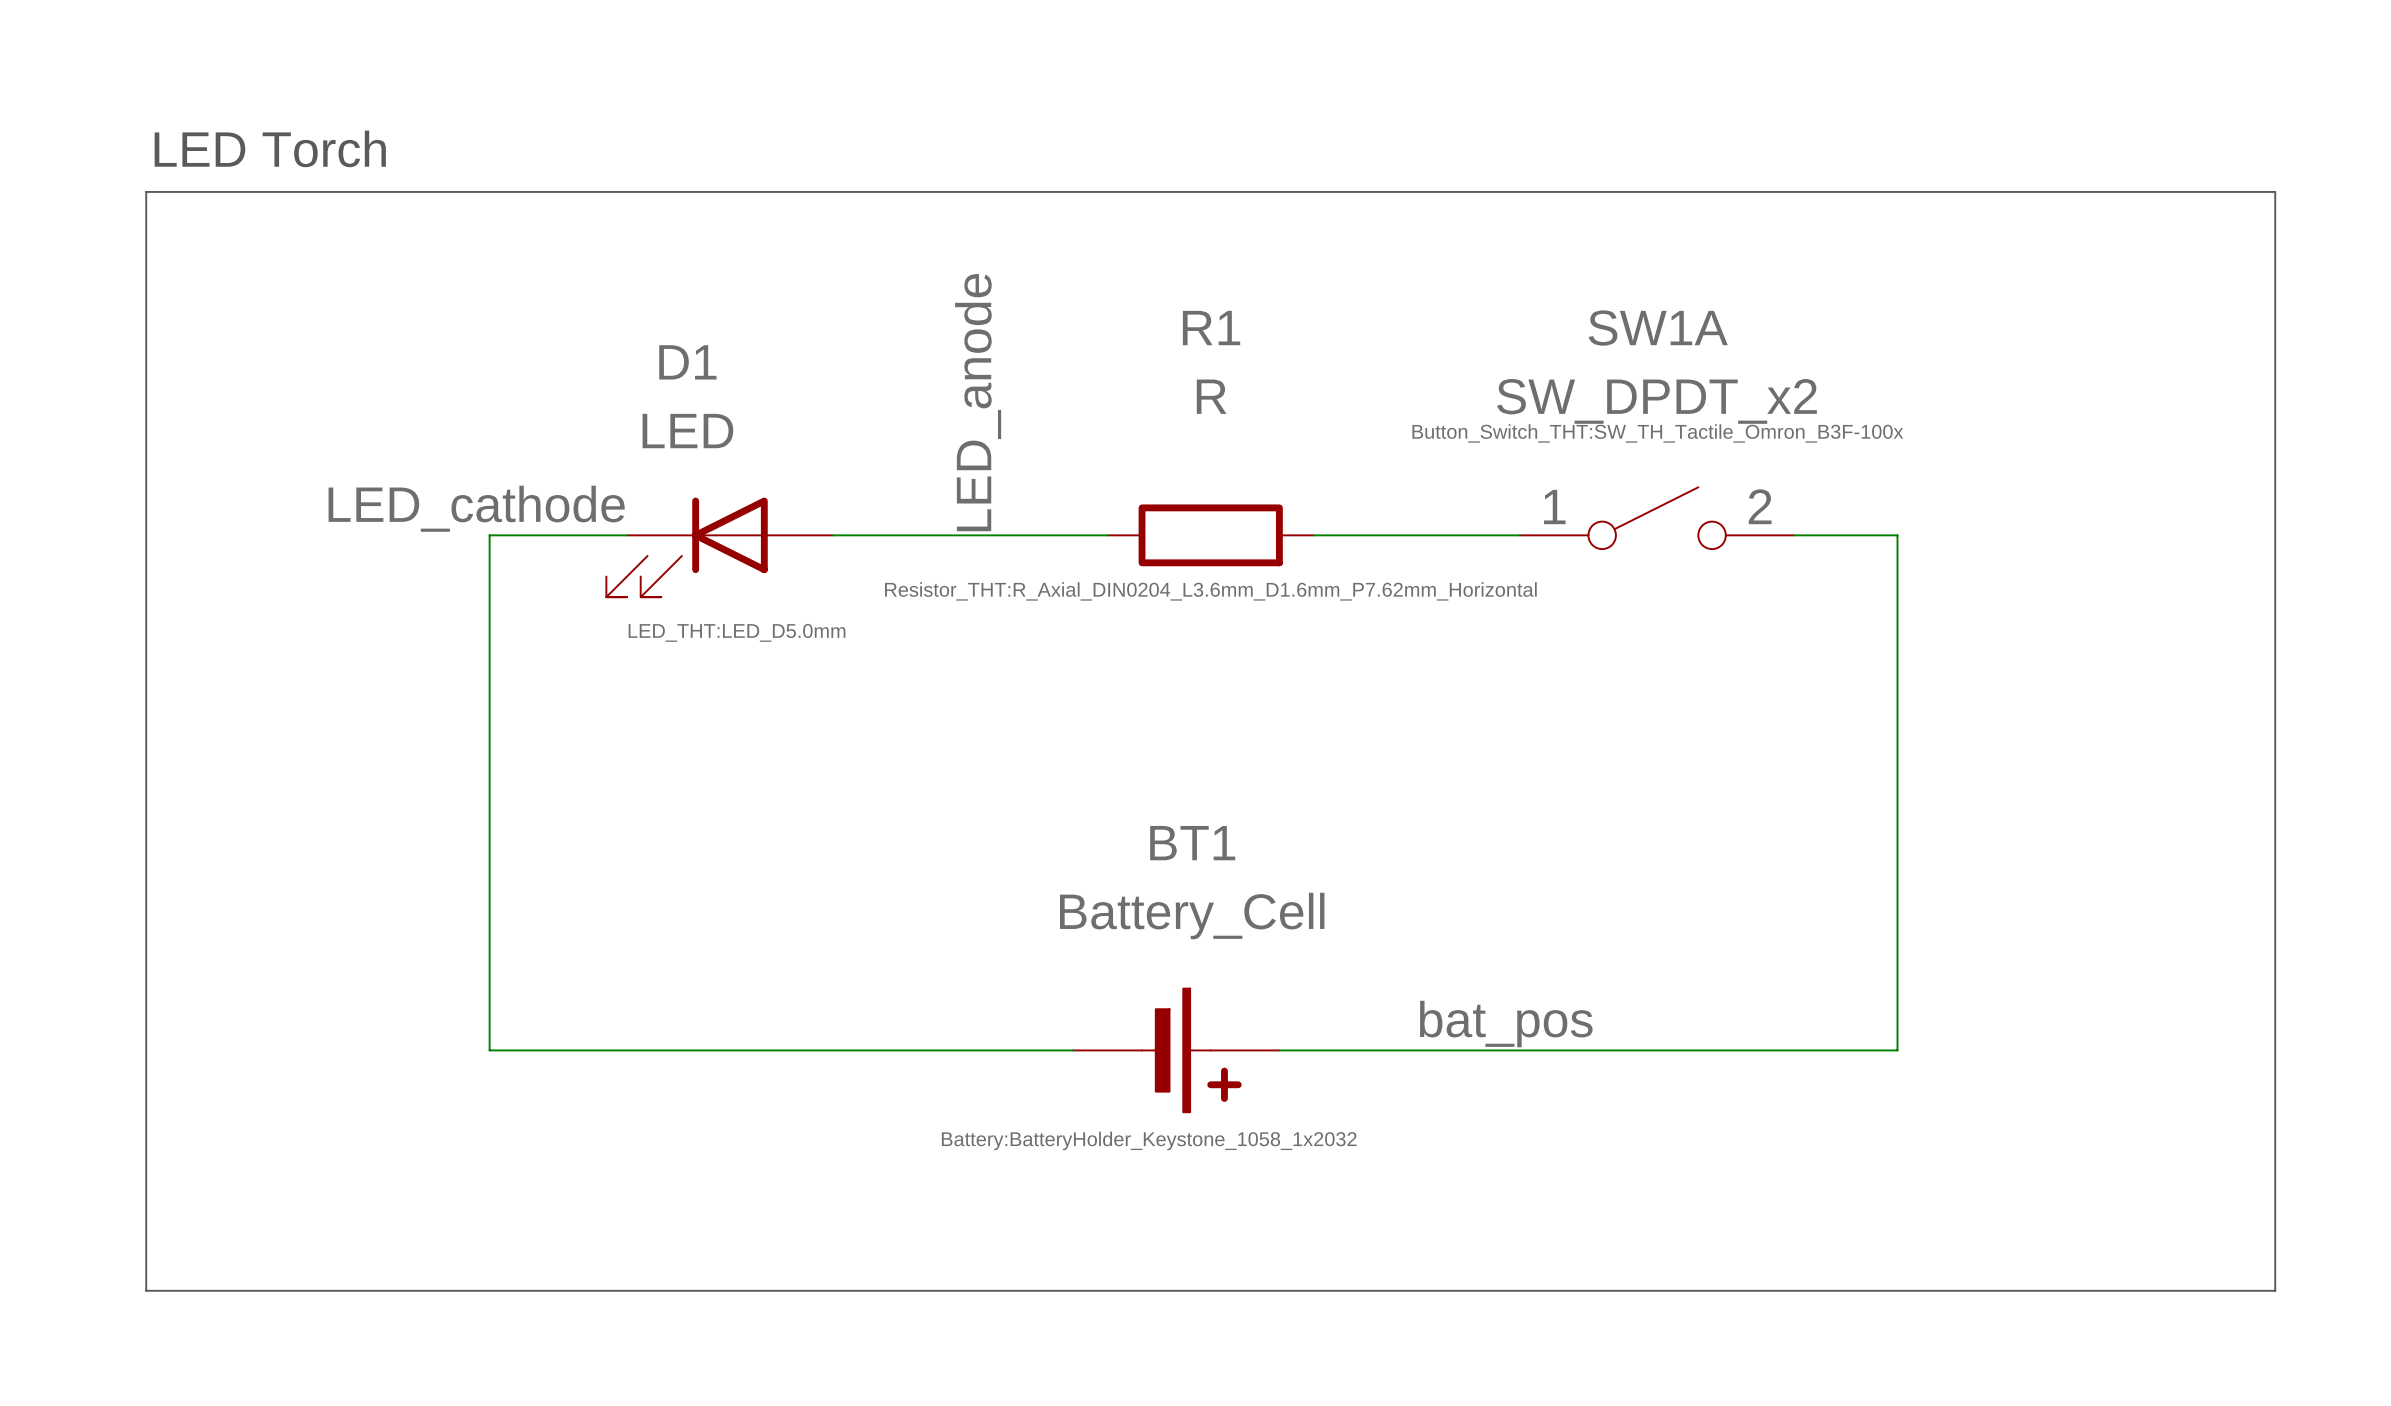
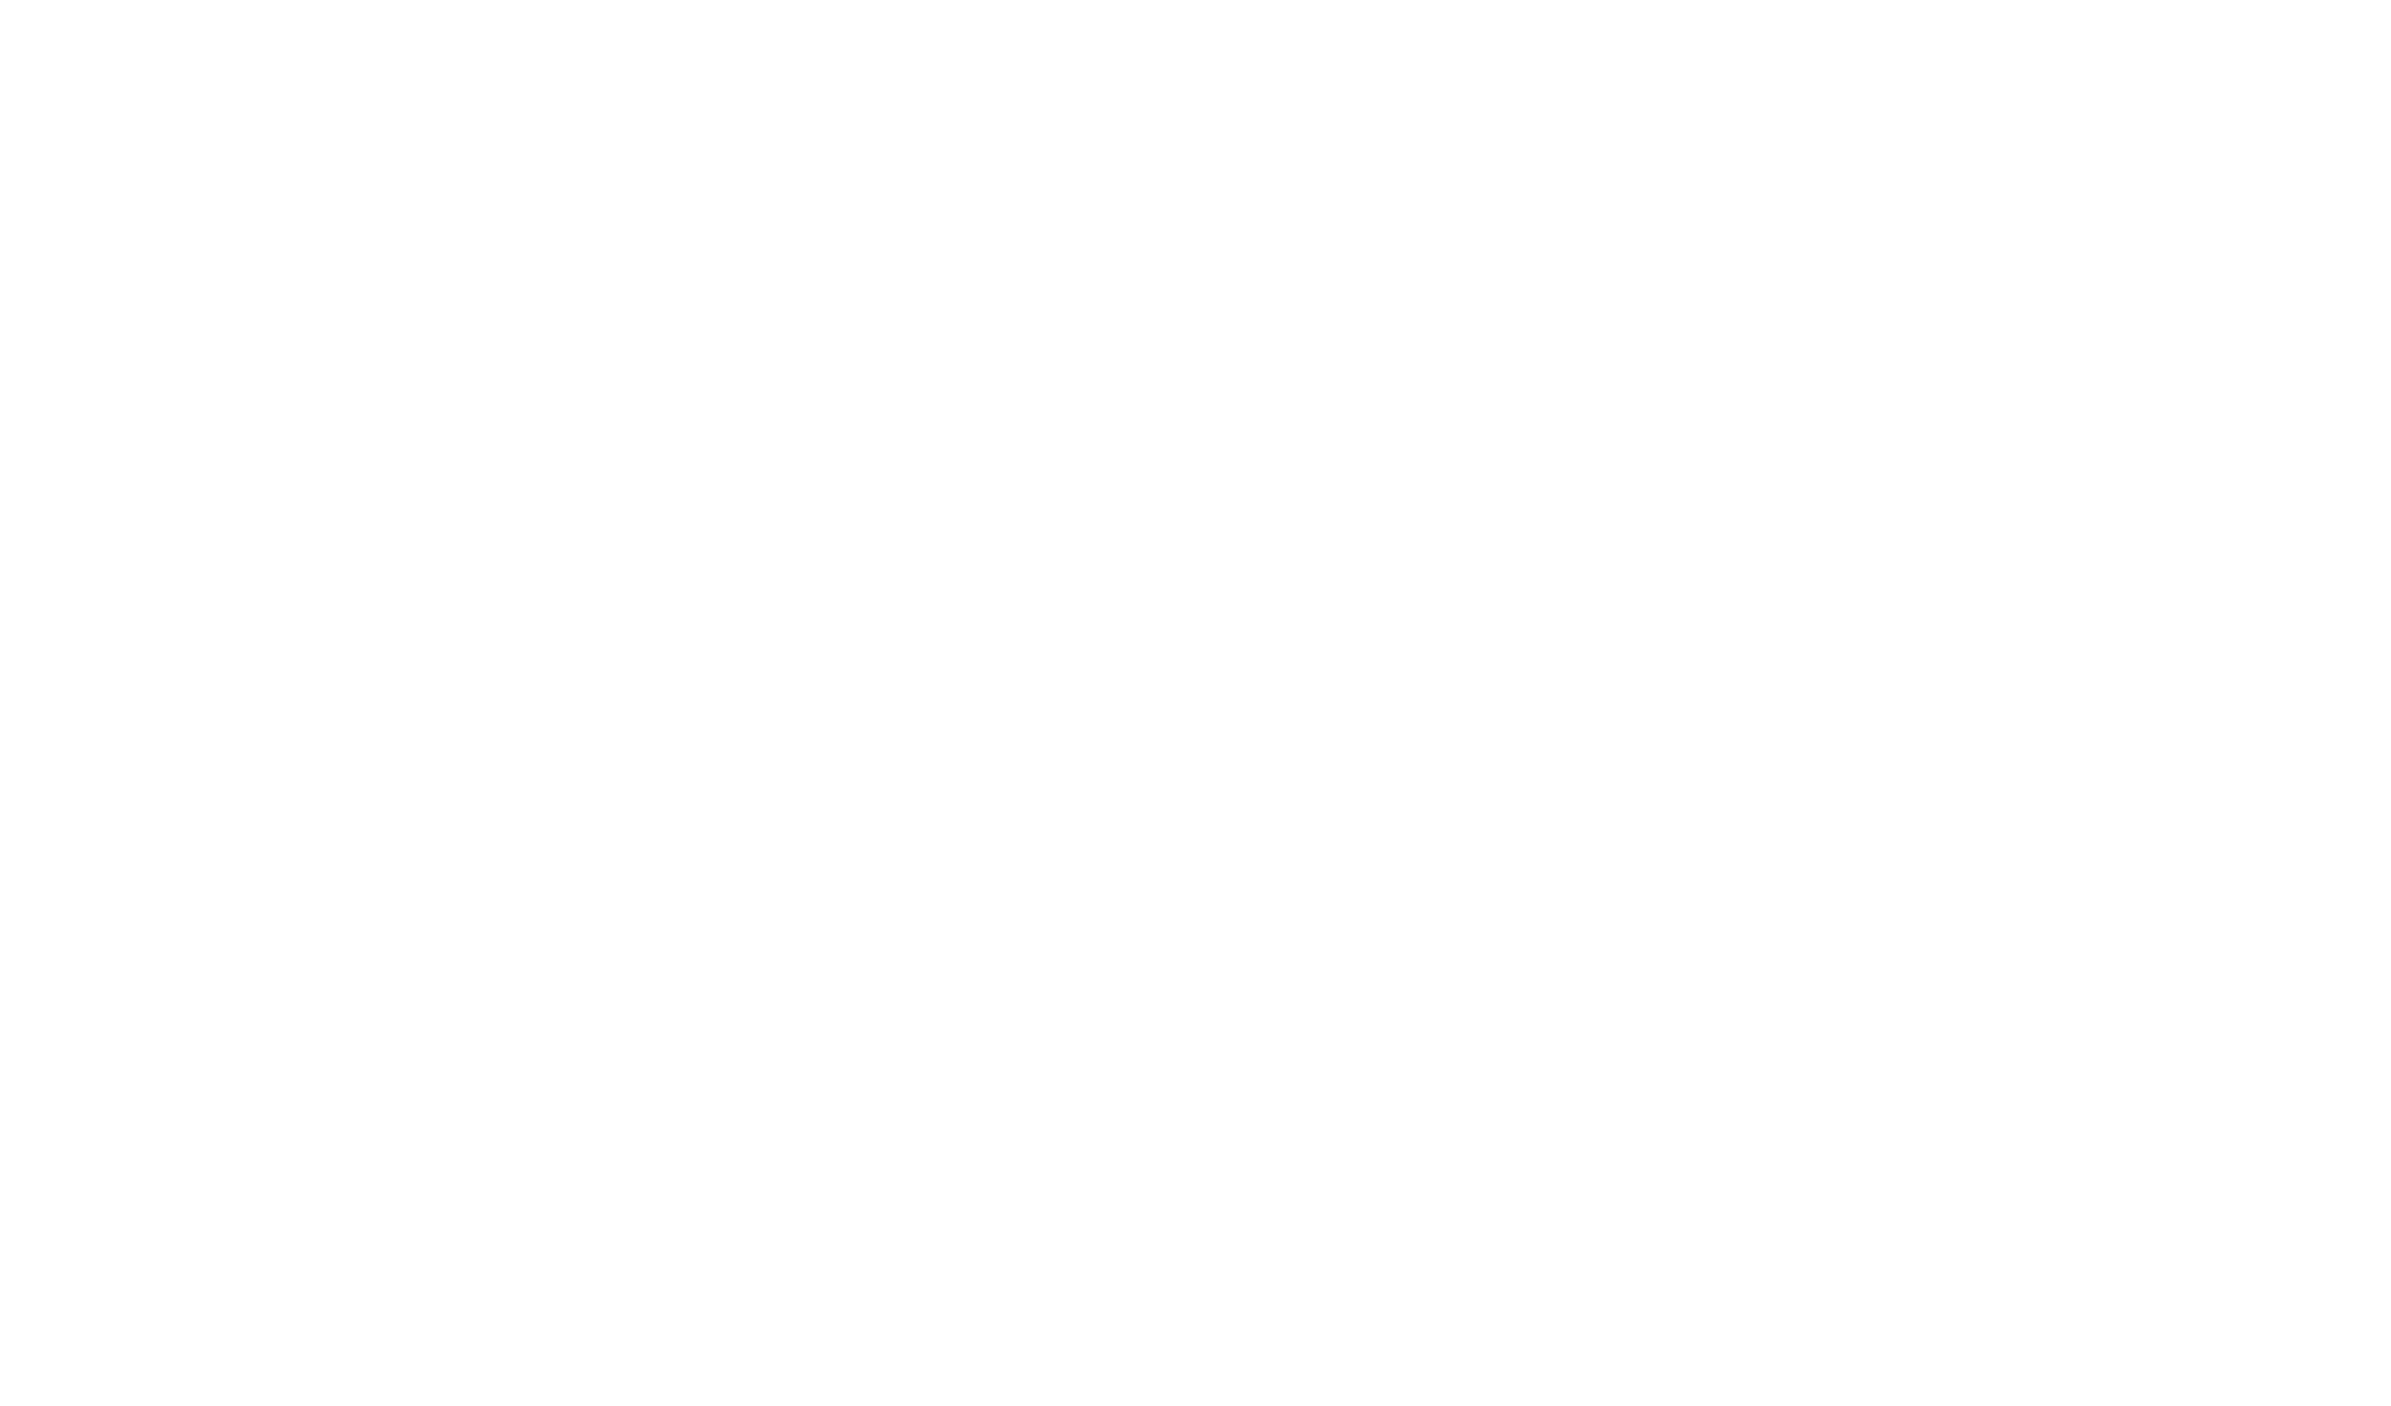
text: LED Torch (270, 148) -> none
line: (146, 191) (2275, 191) (2275, 1290) (146, 1290) (146, 191) -> none
label: LED_anode (978, 402) -> none
label: LED_cathode (476, 508) -> none
SW1A: SW_DPDT_x2 (1657, 518) -> none
wire: (626, 535) (489, 535) (489, 1050) (1073, 1050) -> none
wire: (833, 535) (1107, 535) -> none
R1: R (1210, 535) -> none
wire: (1313, 535) (1519, 535) -> none
wire: (1794, 535) (1897, 535) (1897, 1050) (1279, 1050) -> none
D1: LED (719, 547) -> none
label: bat_pos (1506, 1024) -> none
BT1: Battery_Cell (1176, 1050) -> none

